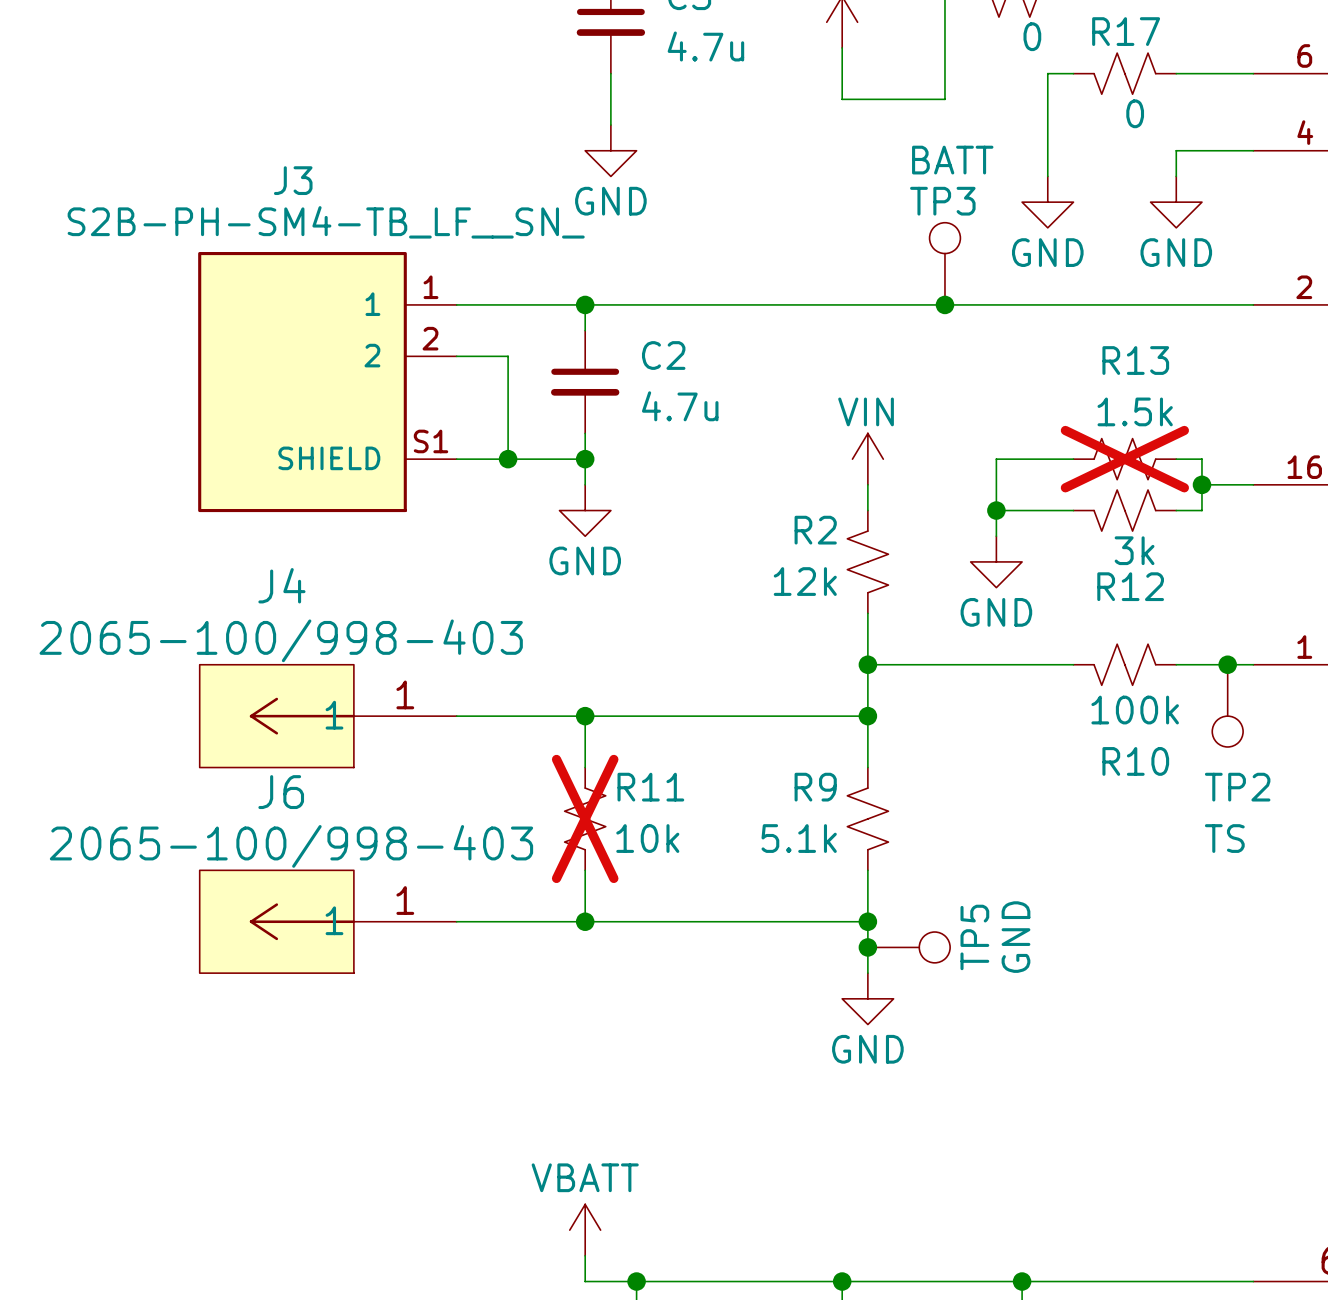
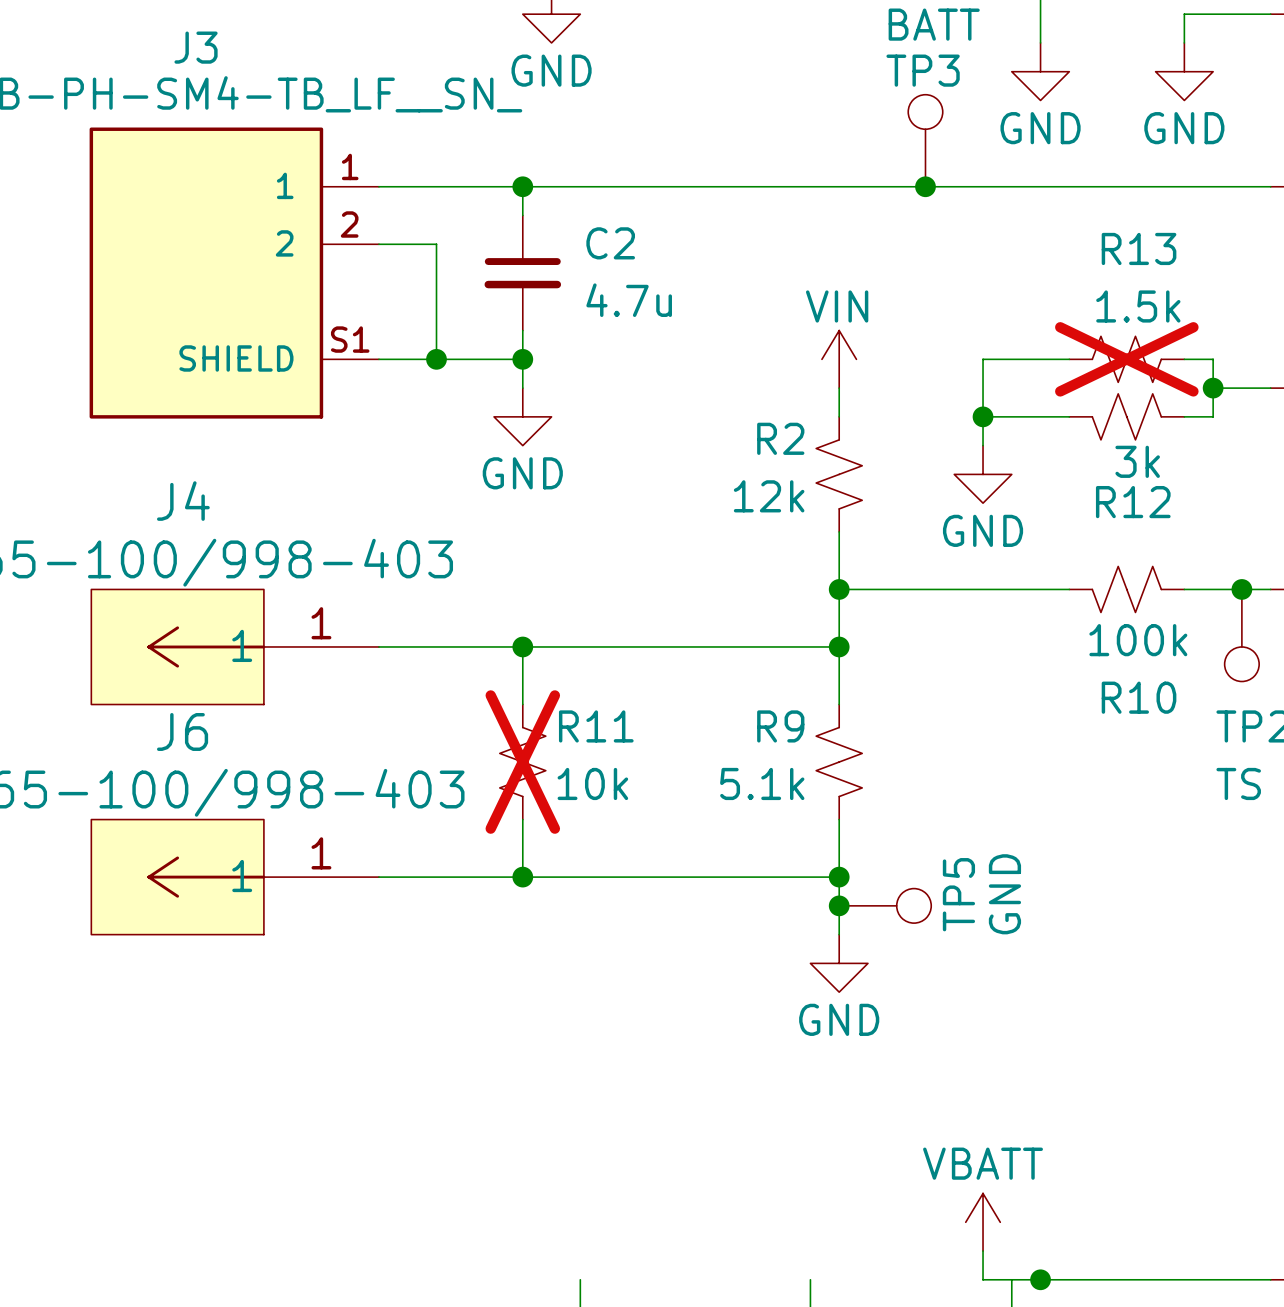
power symbol position: VBATT (585, 1230) -> VBATT (983, 1222)
wire: (585, 1255) (585, 1281) (996, 1281) -> (983, 1251) (983, 1279)
junction: (636, 1281) -> none
junction: (842, 1281) -> none
junction position: (1022, 1281) -> (1040, 1279)

